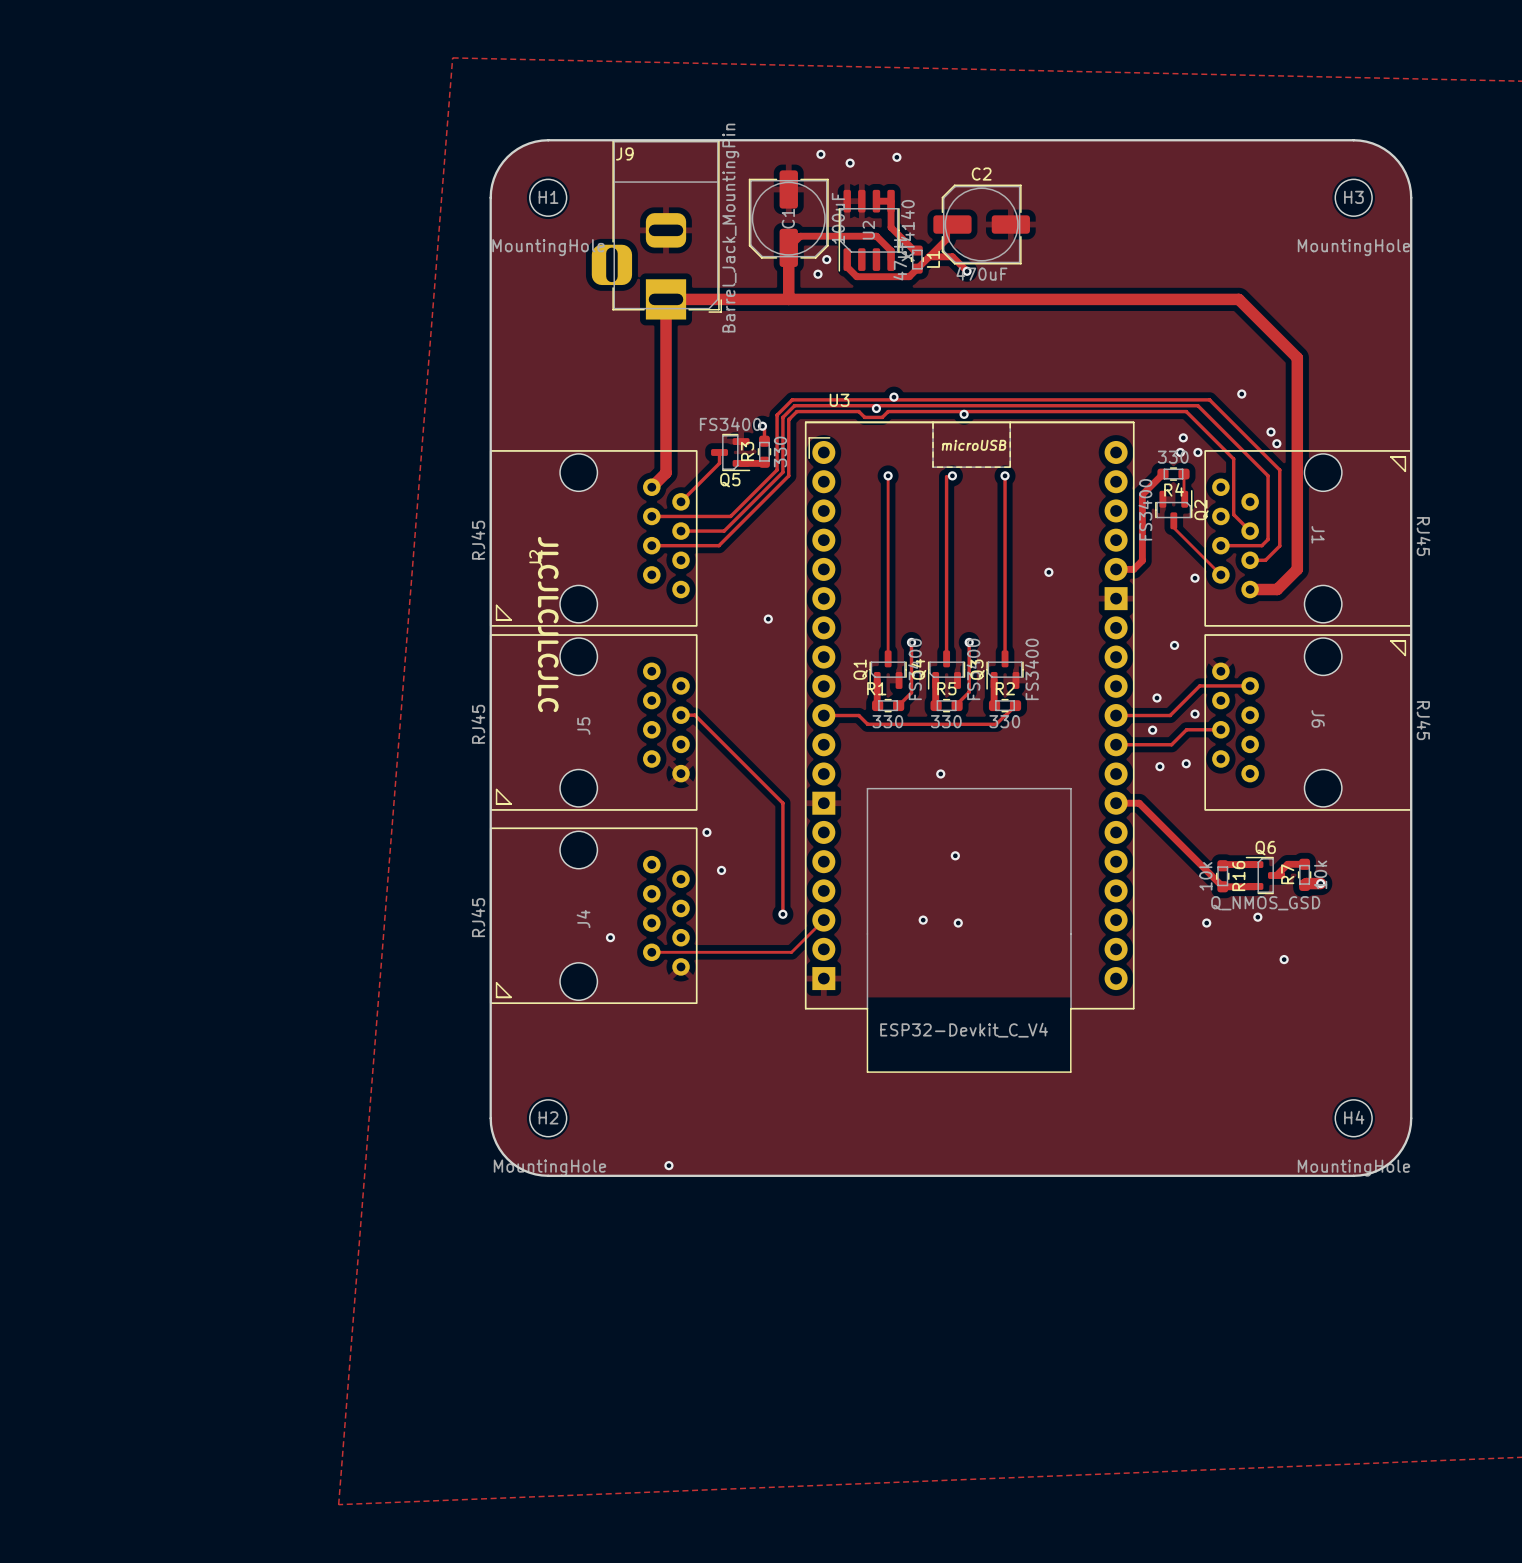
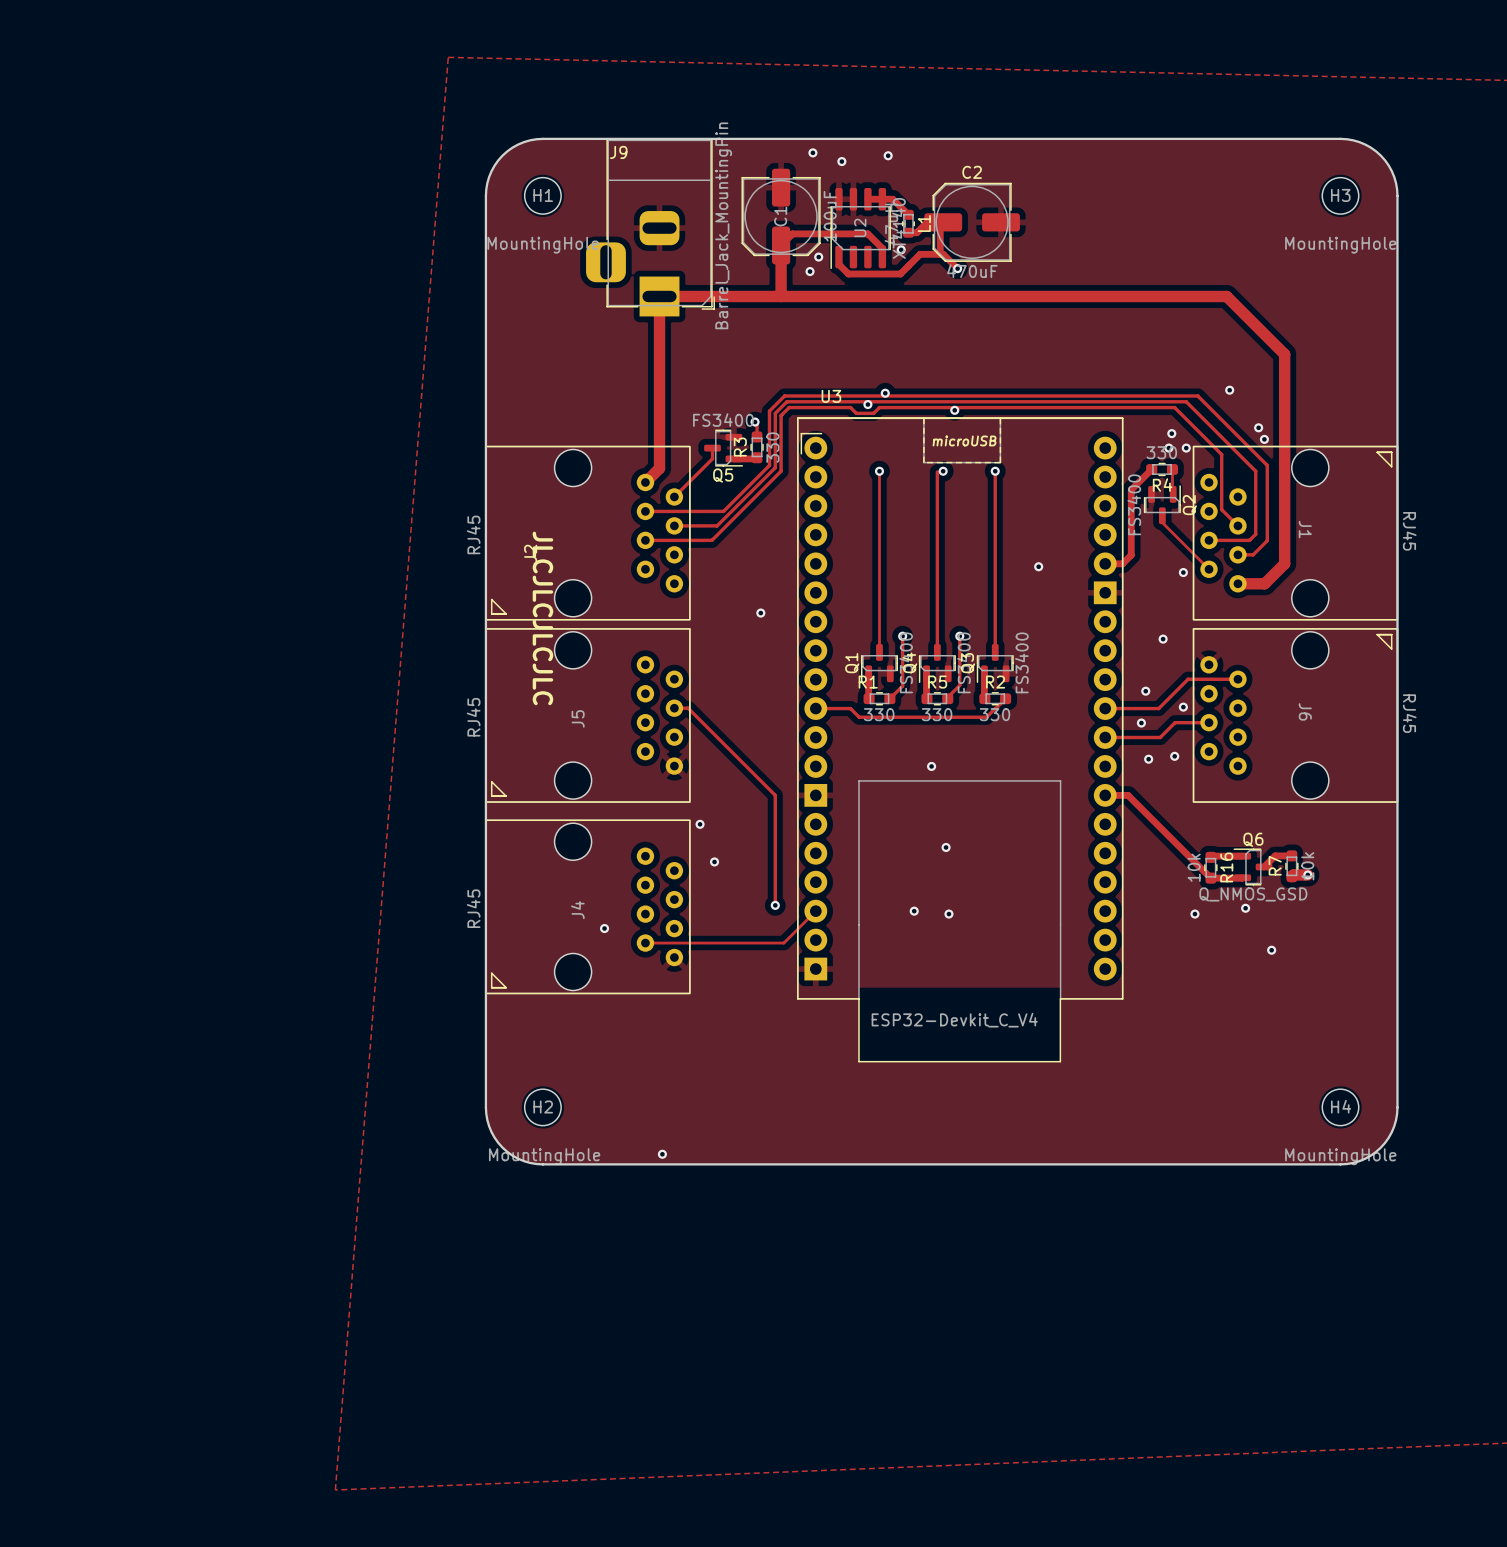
track: (891, 201) (891, 227) (914, 250) (917, 250) -> (882, 199) (892, 199) (908, 214)
track: (946, 224) (946, 239) (929, 256) -> none
track: none -> (908, 232) (916, 232) (927, 222) (943, 222) (940, 225) (940, 254)
via: none -> (901, 249)
L1 position: (917, 259) -> (908, 223)

